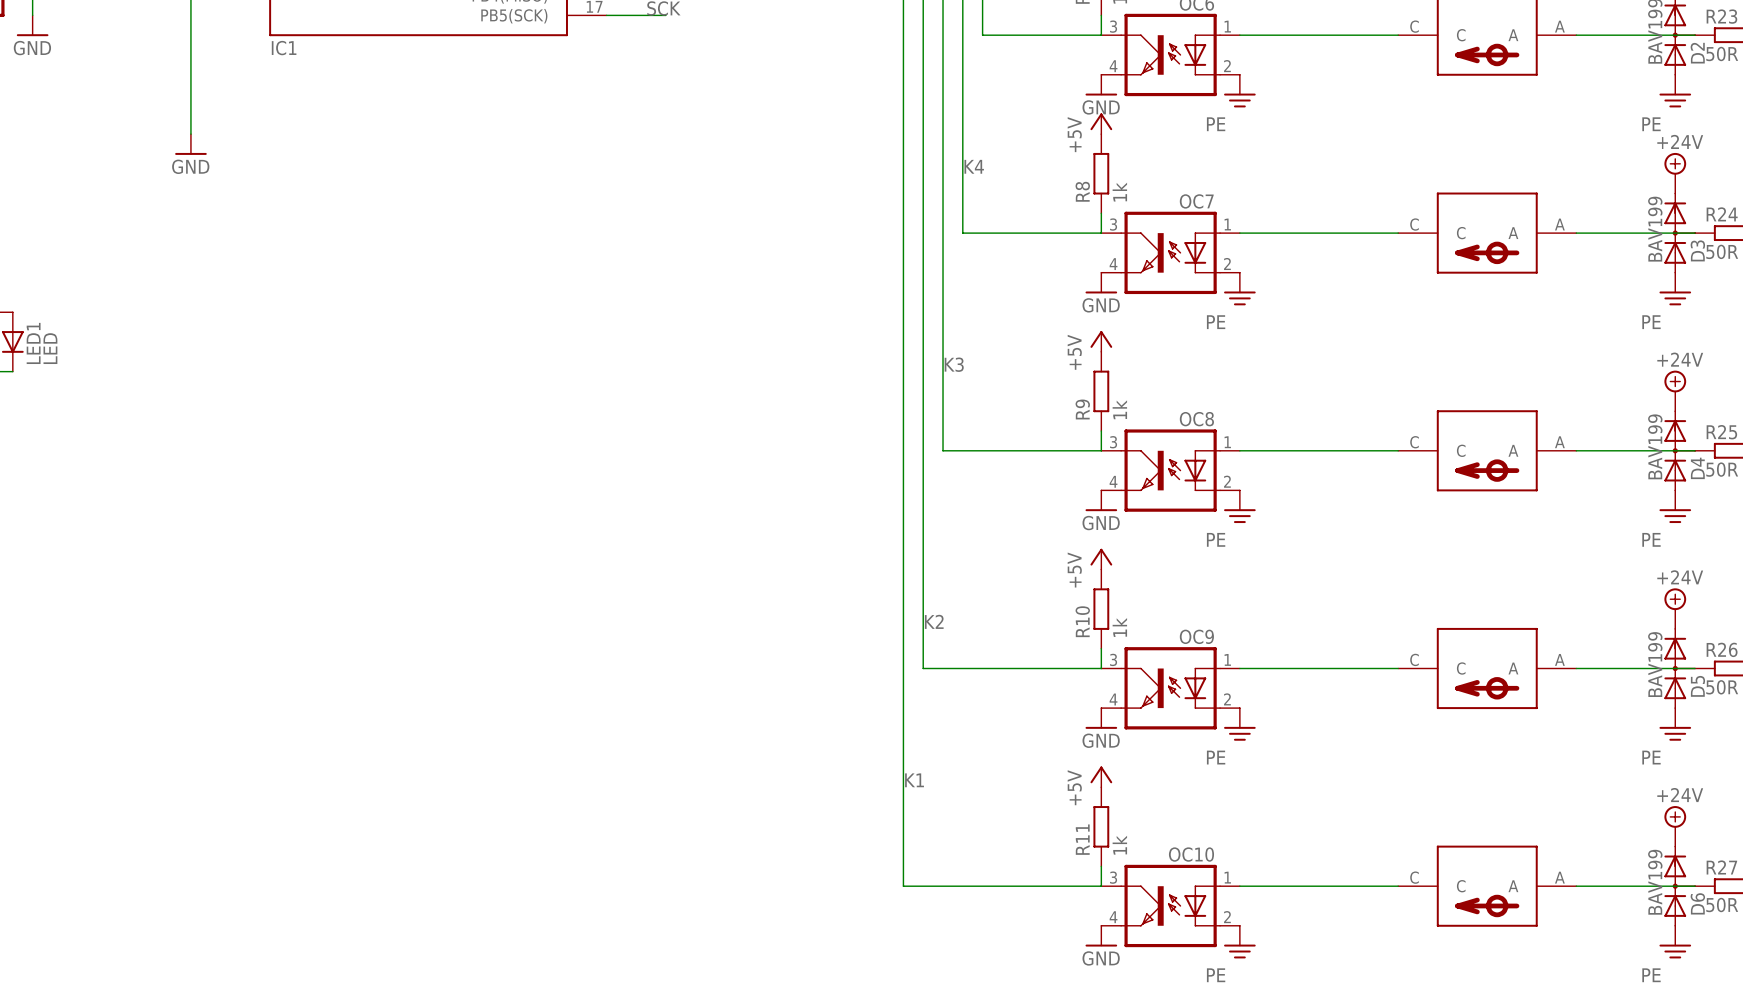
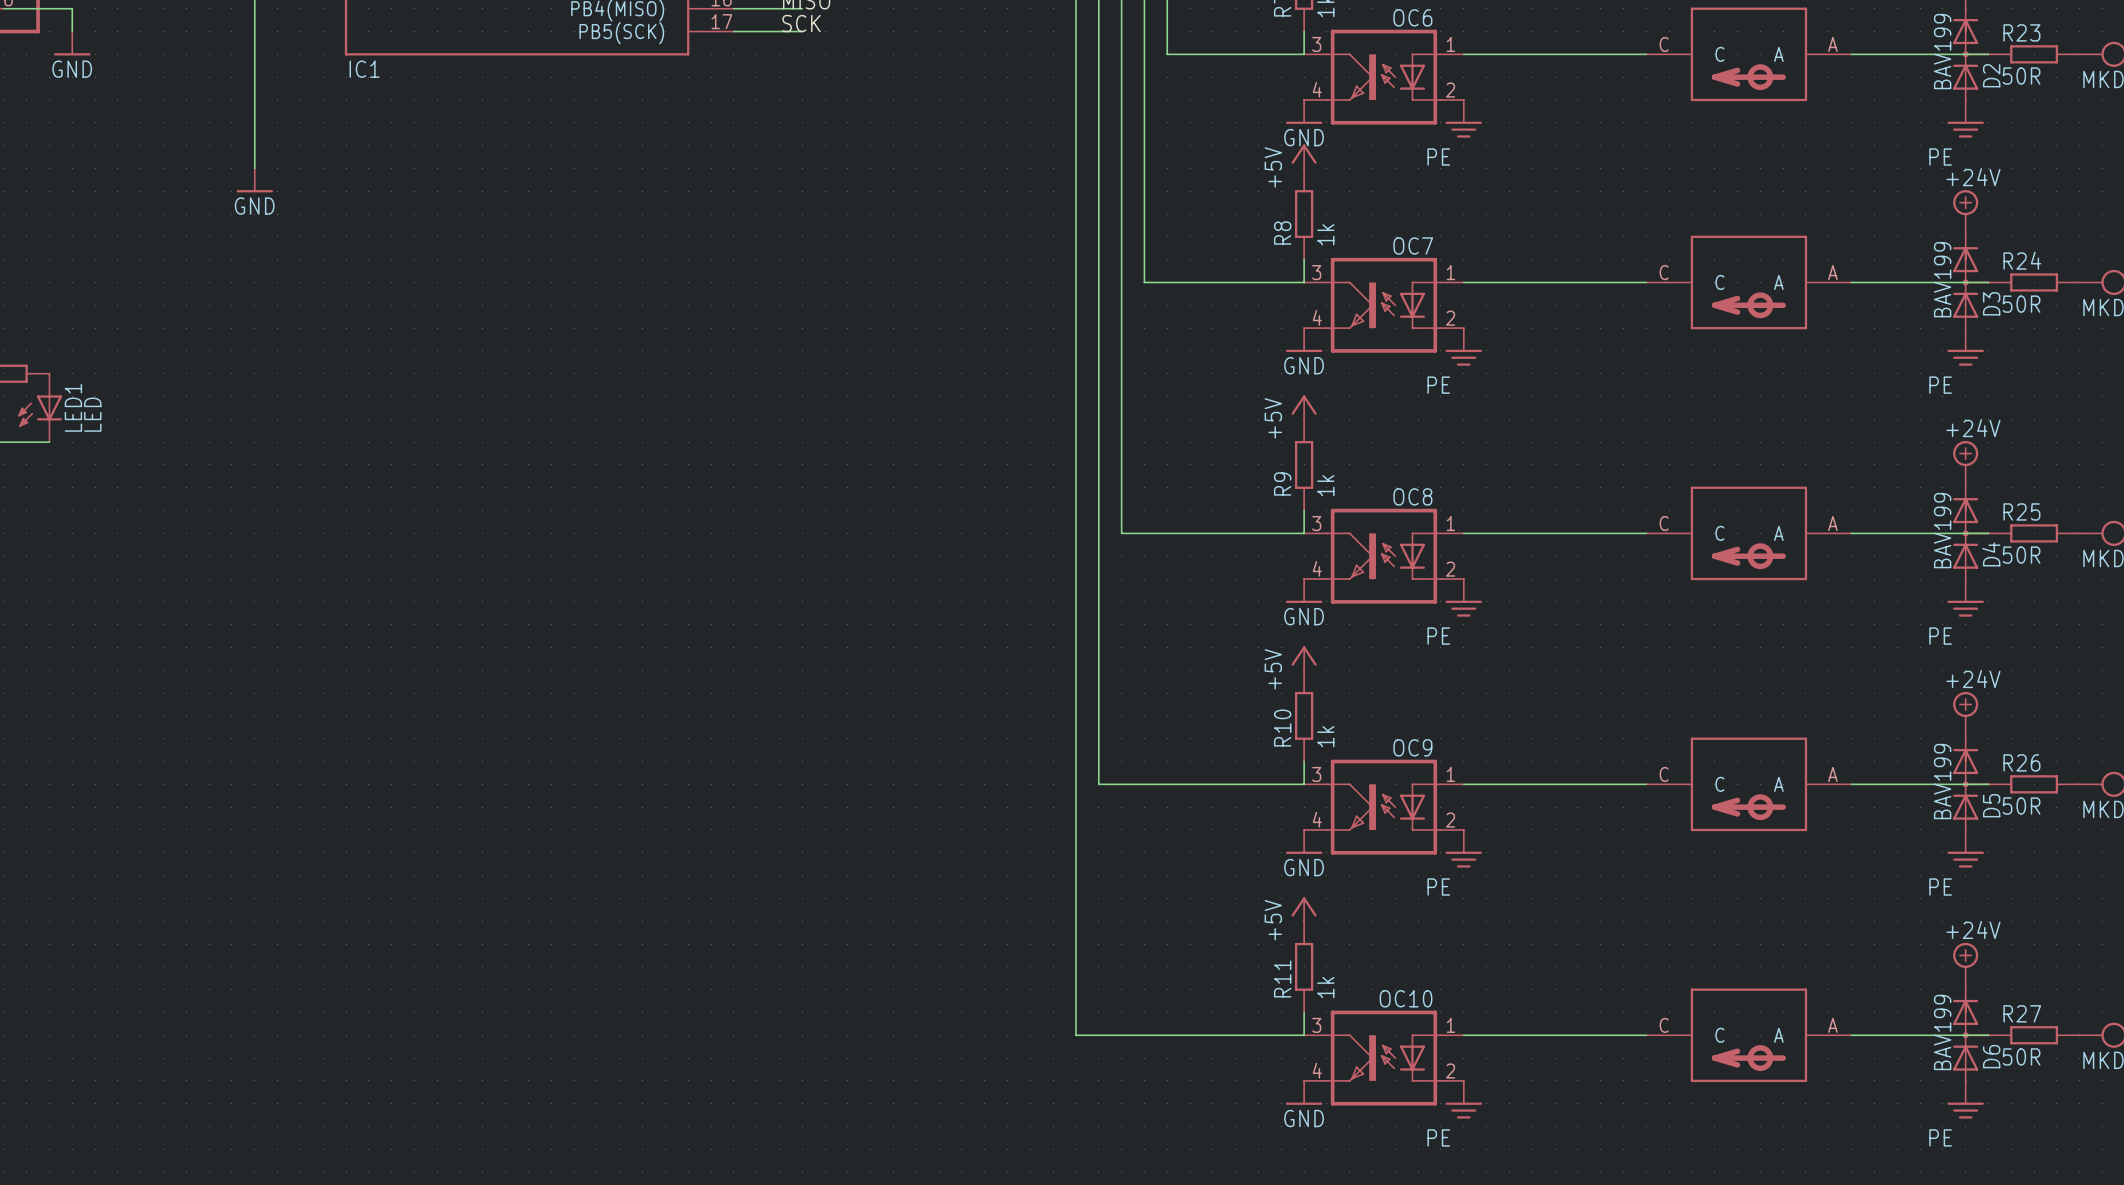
label: K4 (974, 166) -> none
label: K3 (954, 364) -> none
label: K2 (934, 621) -> none
label: K1 (914, 780) -> none

